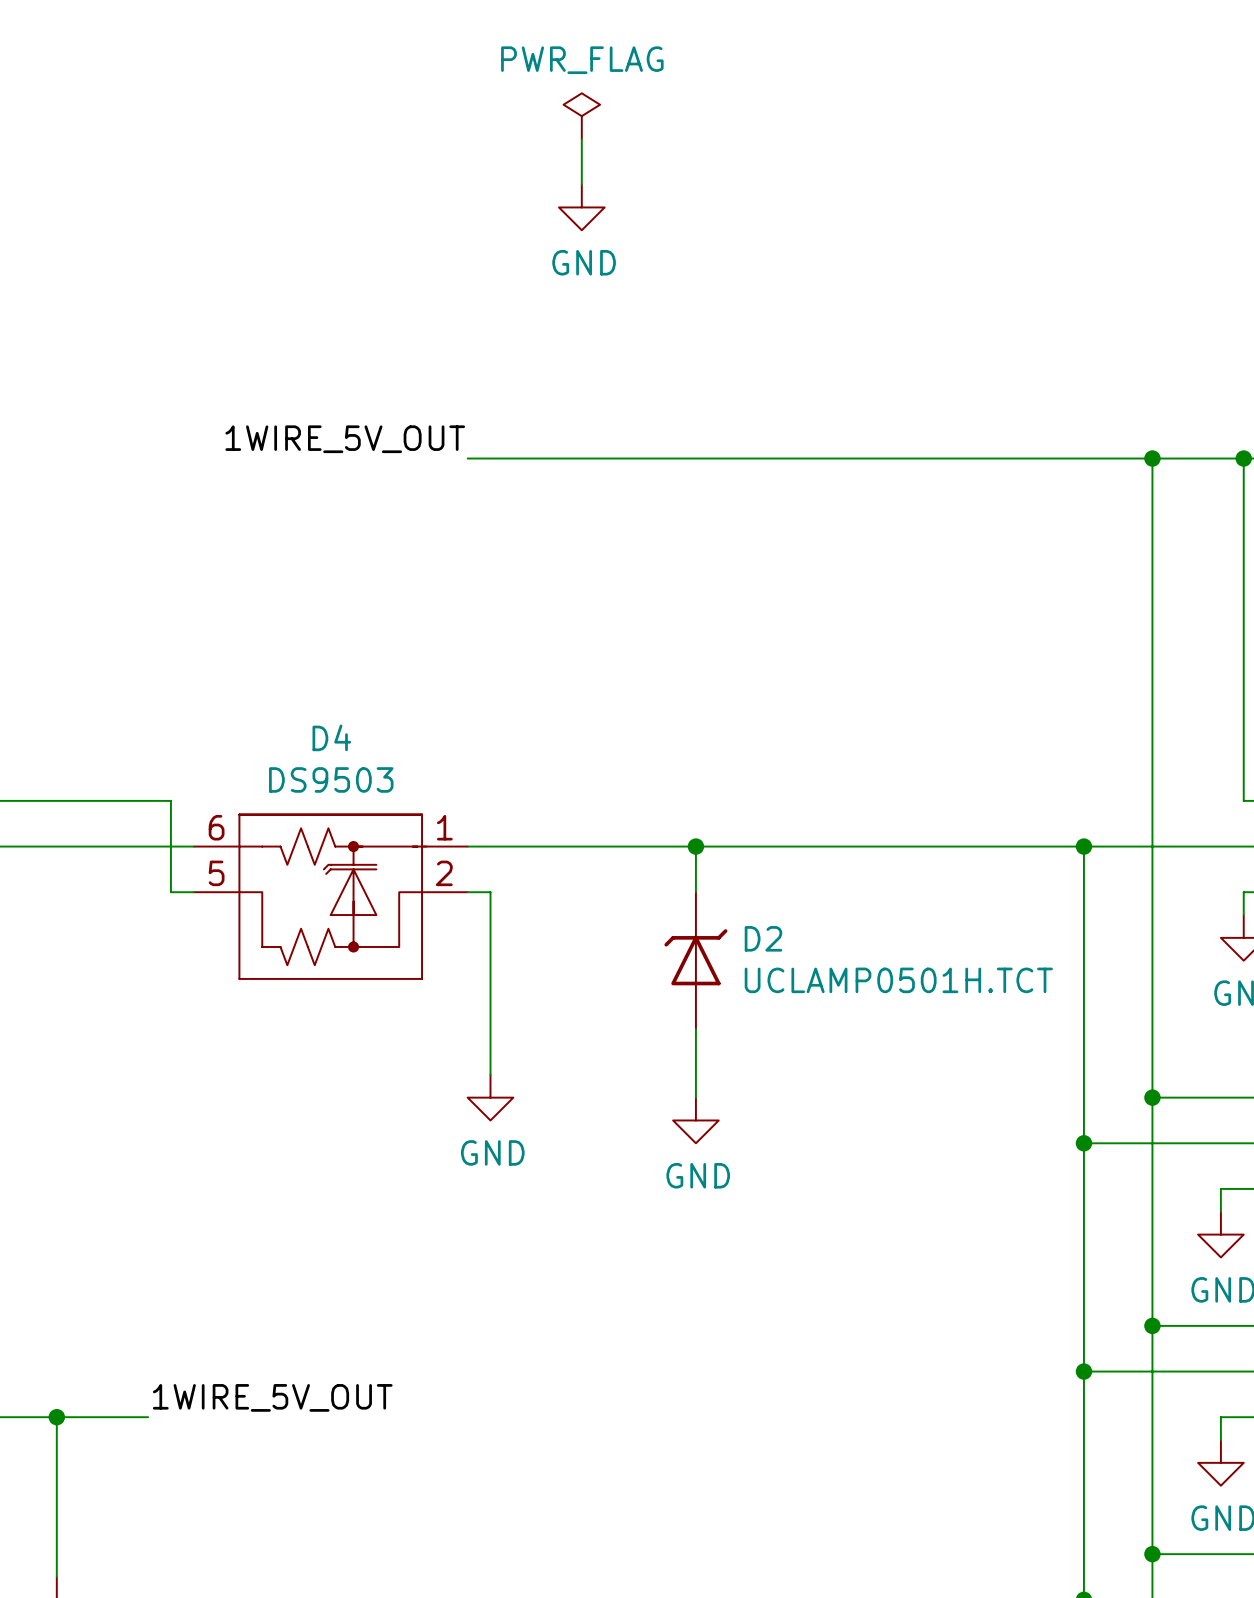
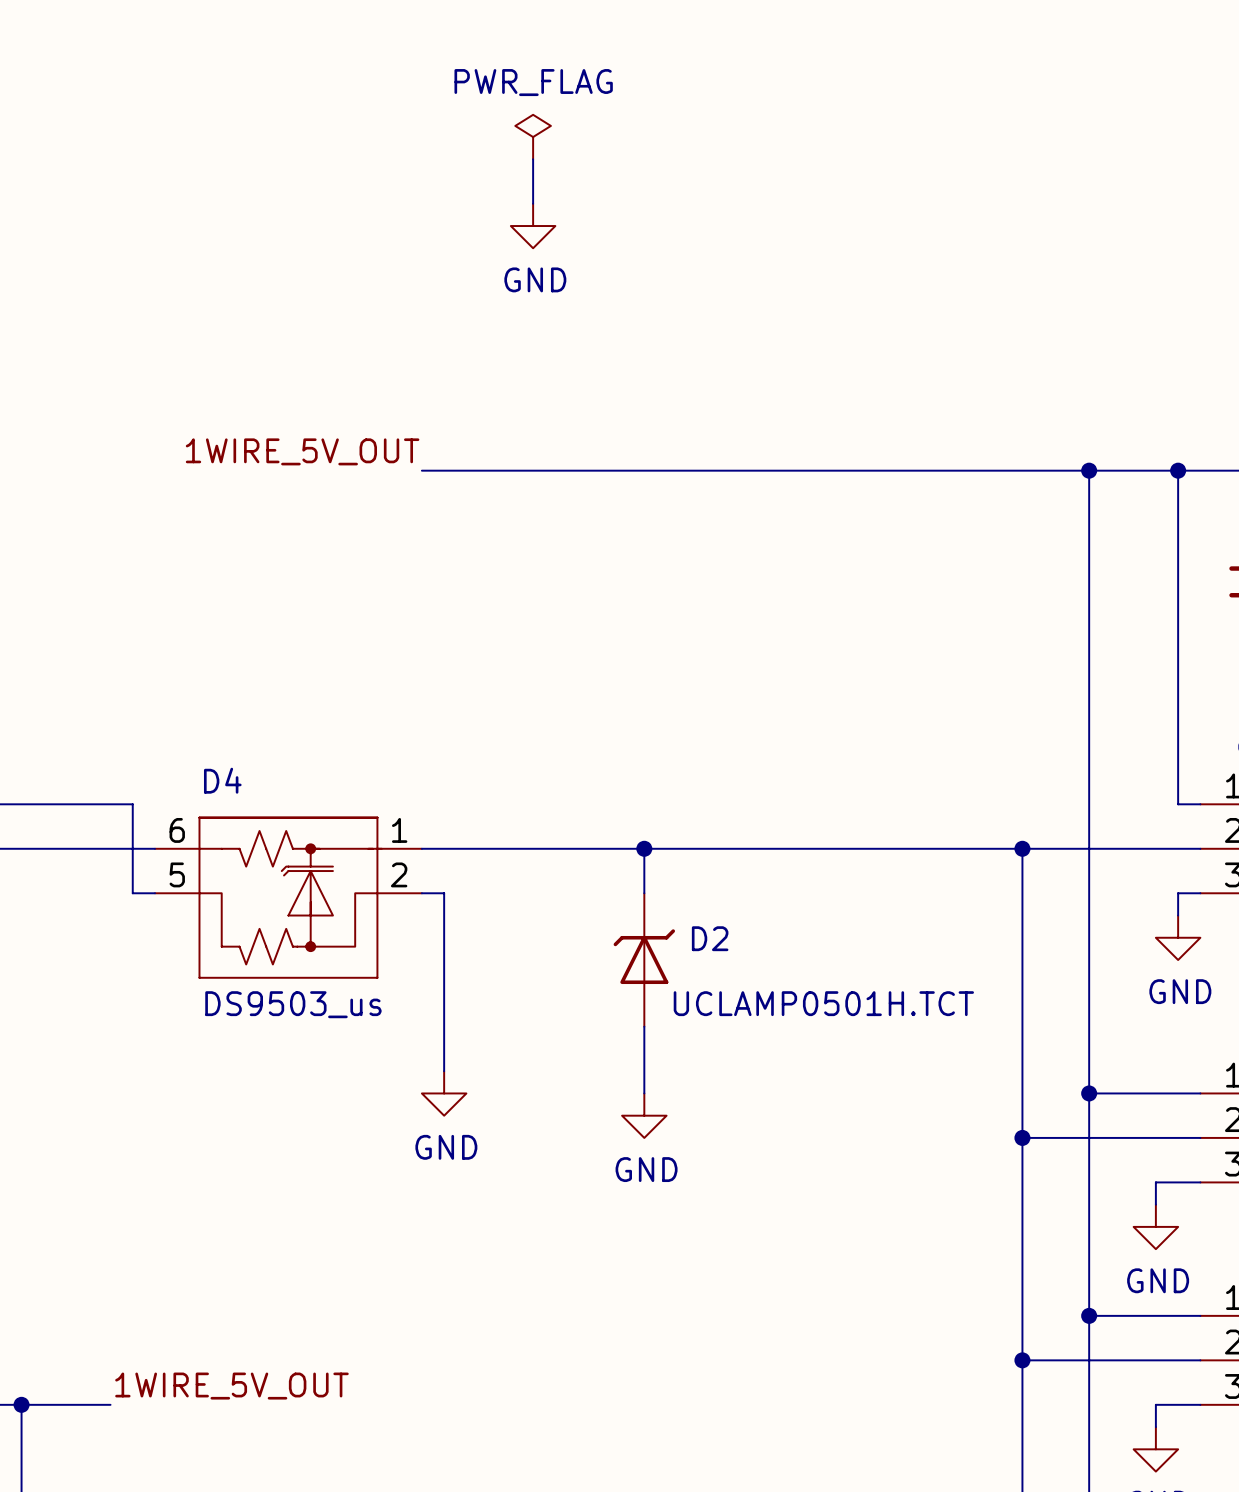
D4 name position: D4 (331, 737) -> D4 (222, 780)
D4 value: DS9503 (331, 779) -> DS9503_us (293, 1004)
D2 value position: UCLAMP0501H.TCT (898, 980) -> UCLAMP0501H.TCT (823, 1003)

